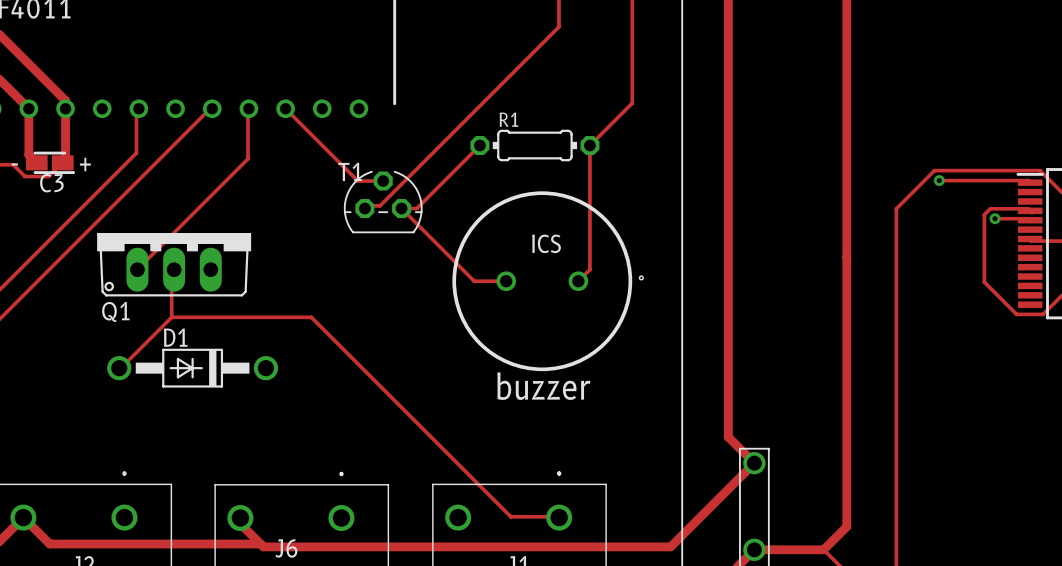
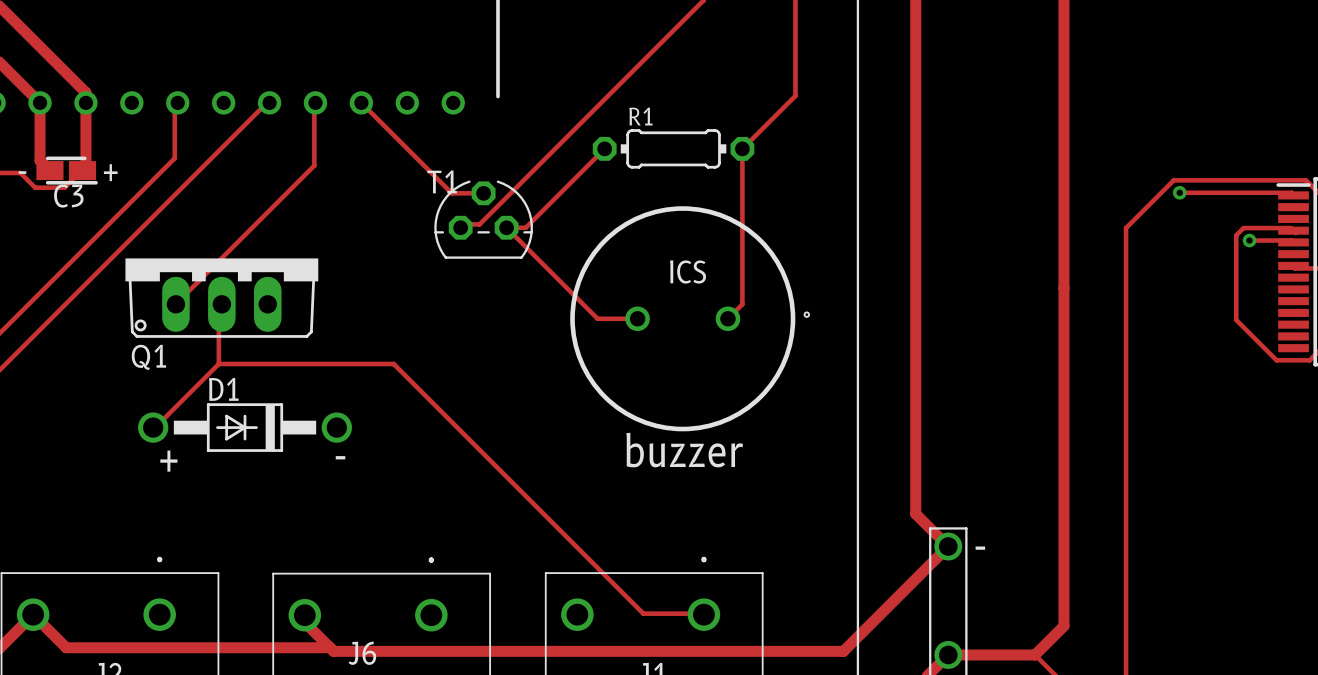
text: none -> - (340, 457)
text: none -> + (168, 461)
text: none -> - (980, 548)

